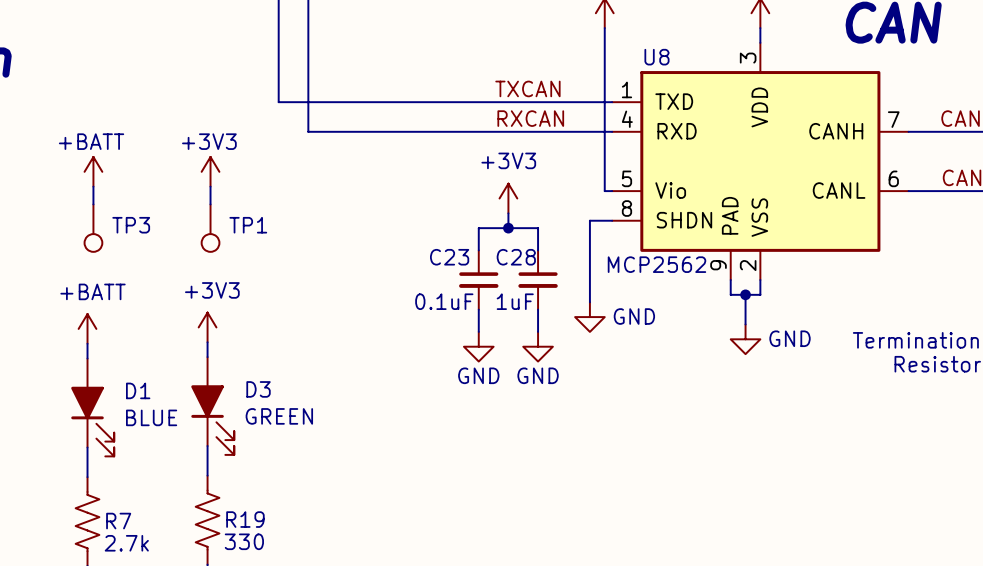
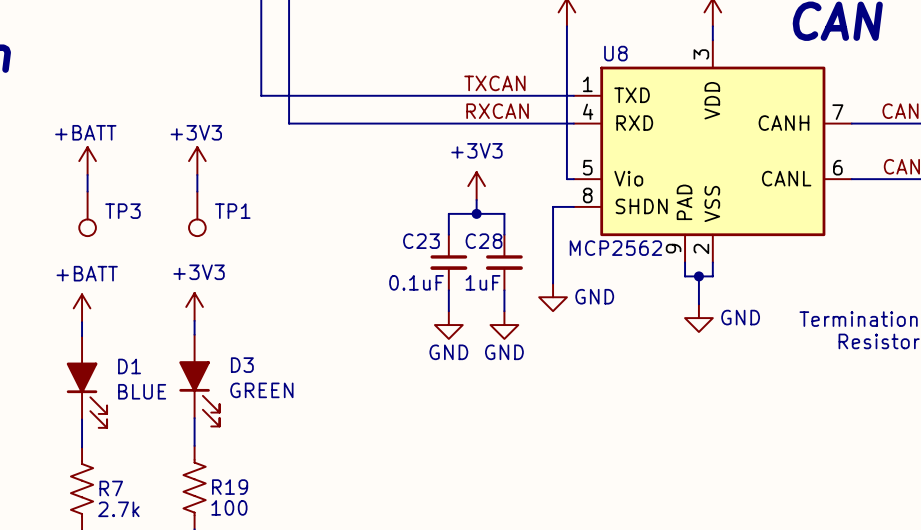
R19 value: 330 (244, 541) -> 100 (229, 507)

